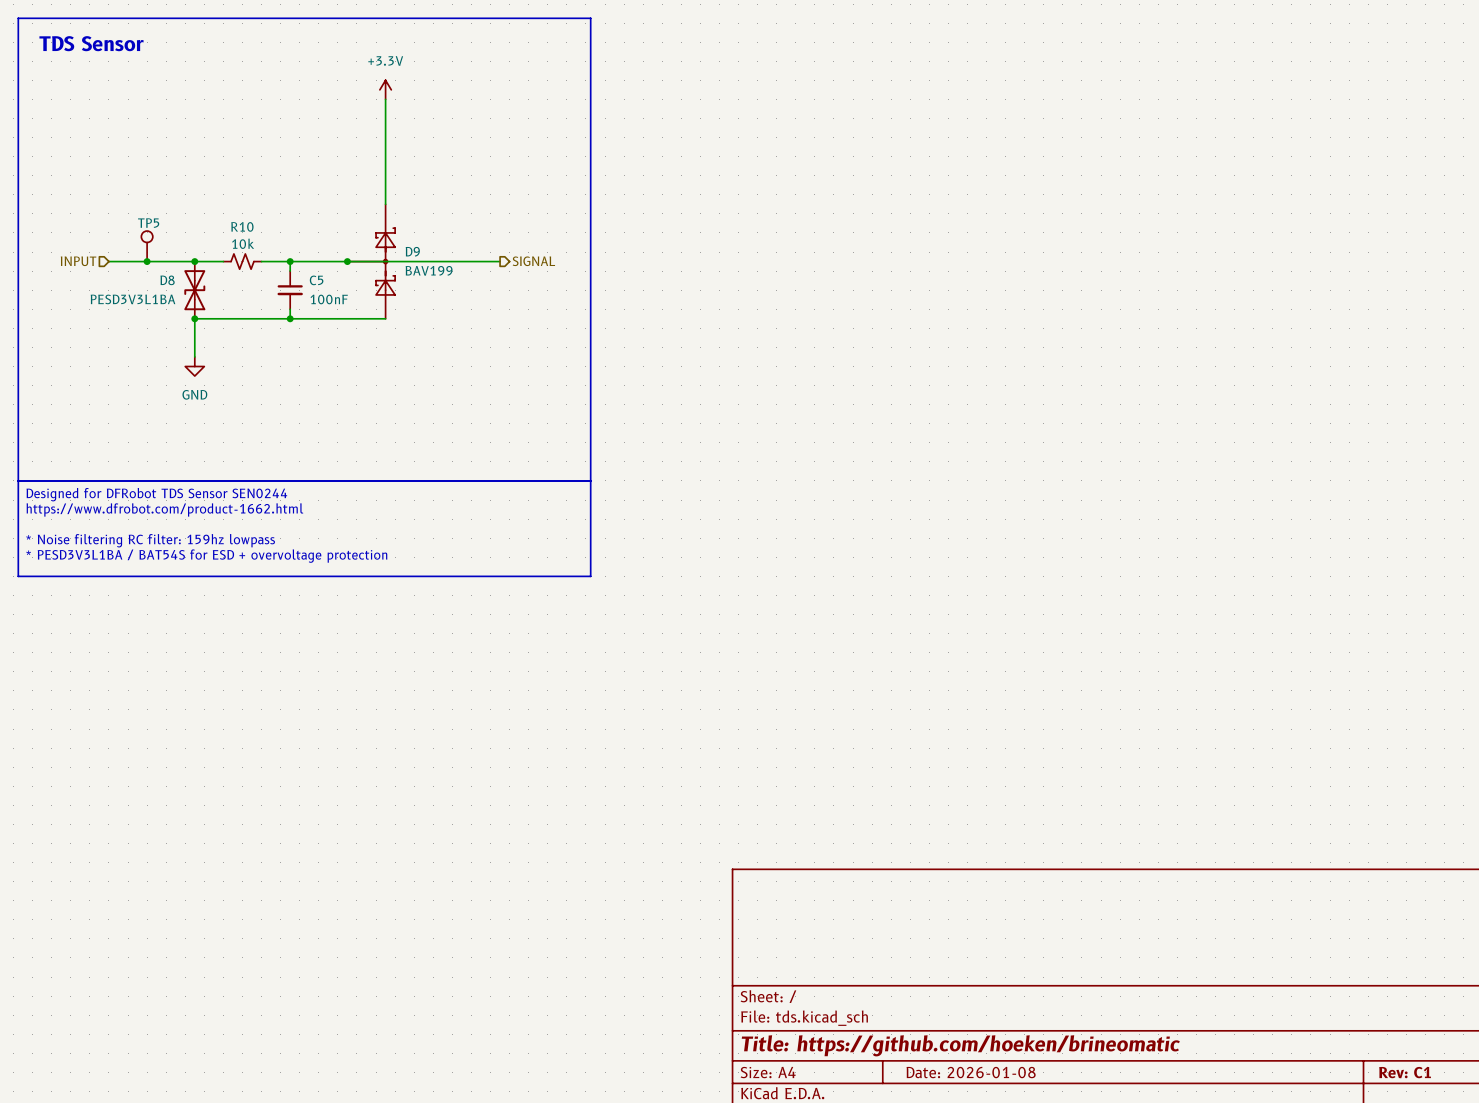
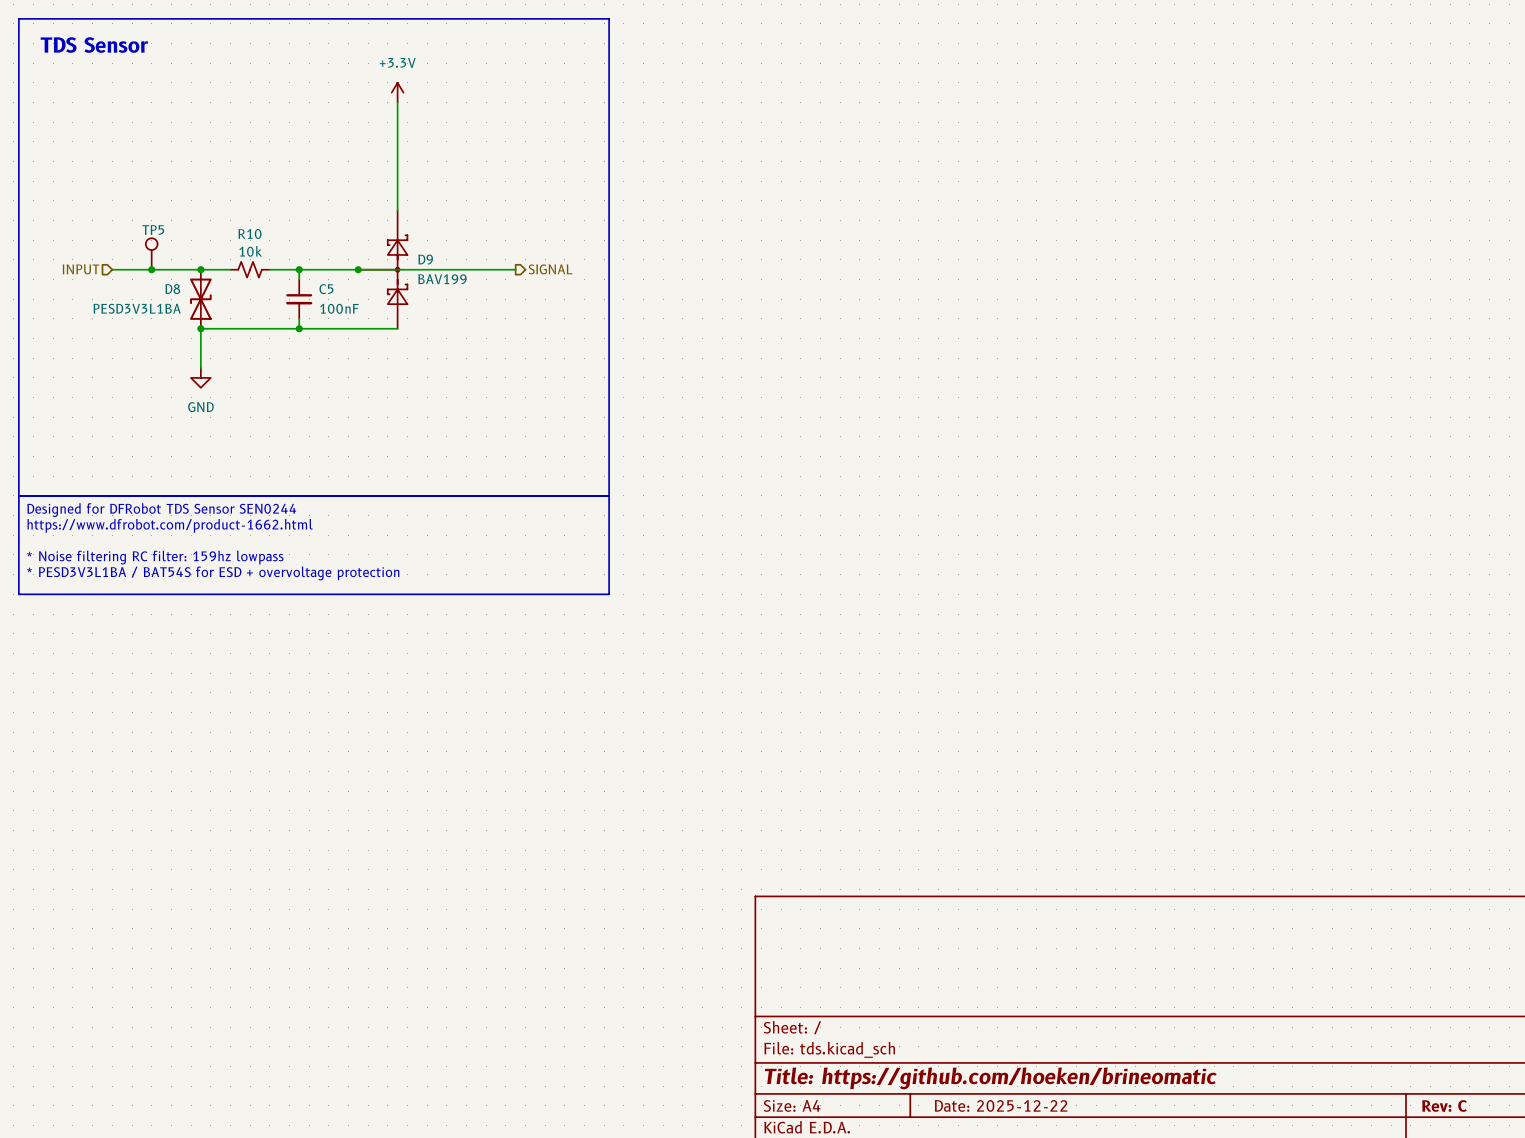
title block: Date: 2026-01-08 (971, 1072) -> Date: 2025-12-22 (1001, 1105)
title block: Rev: C1 (1405, 1072) -> Rev: C (1444, 1106)

